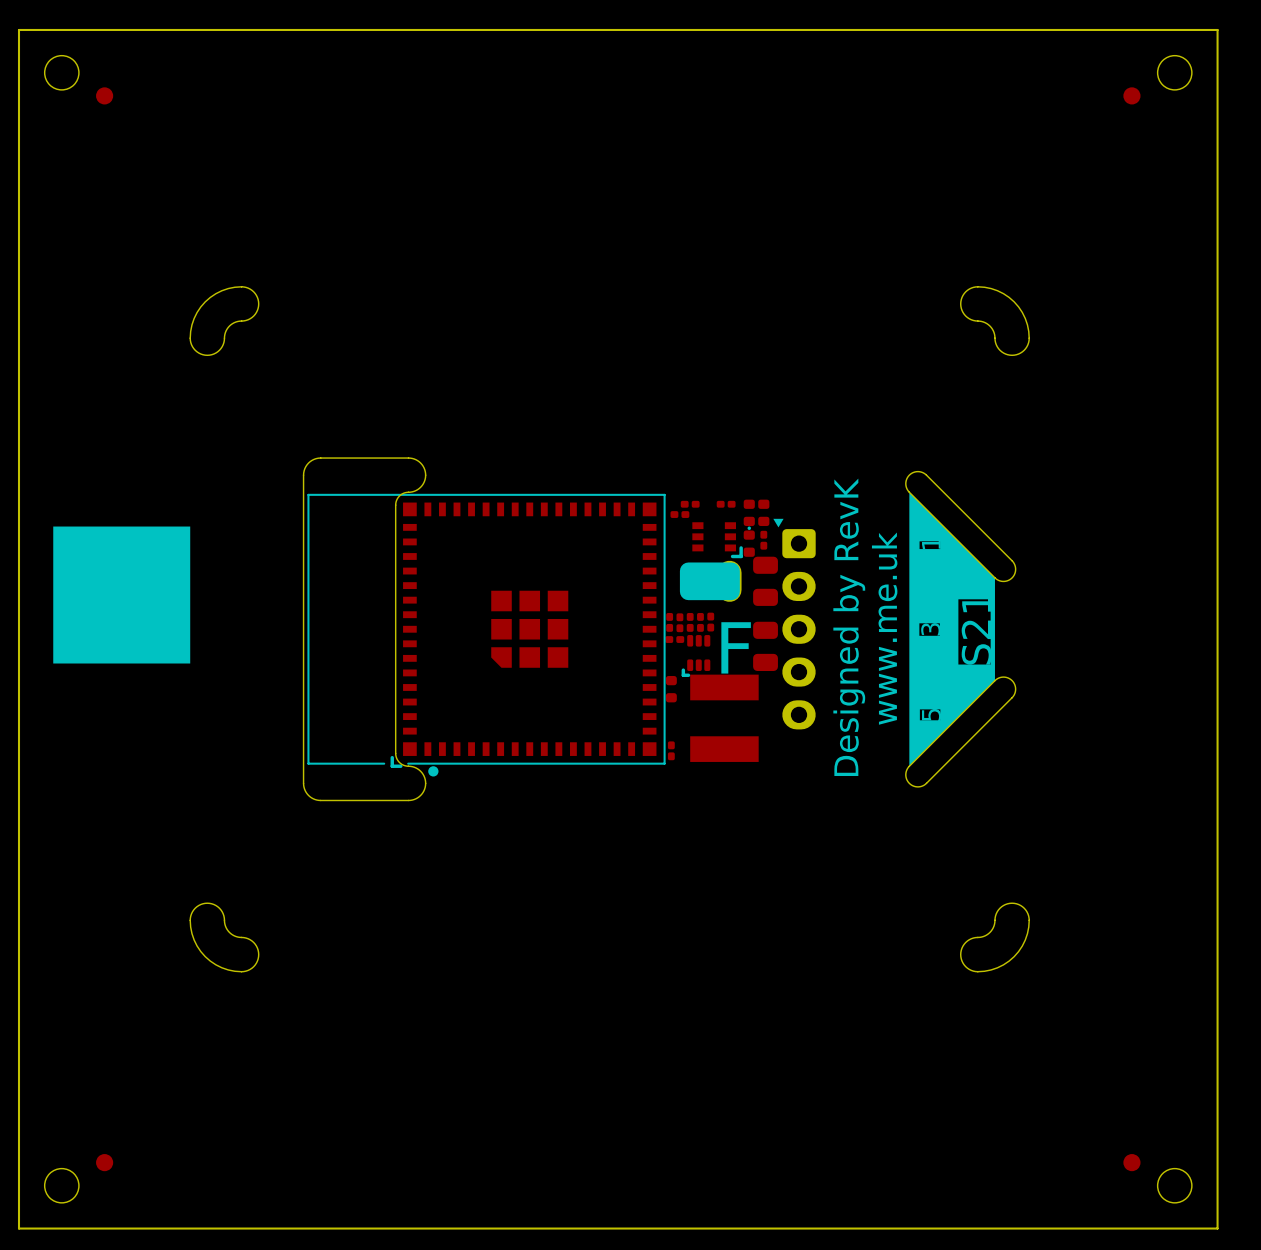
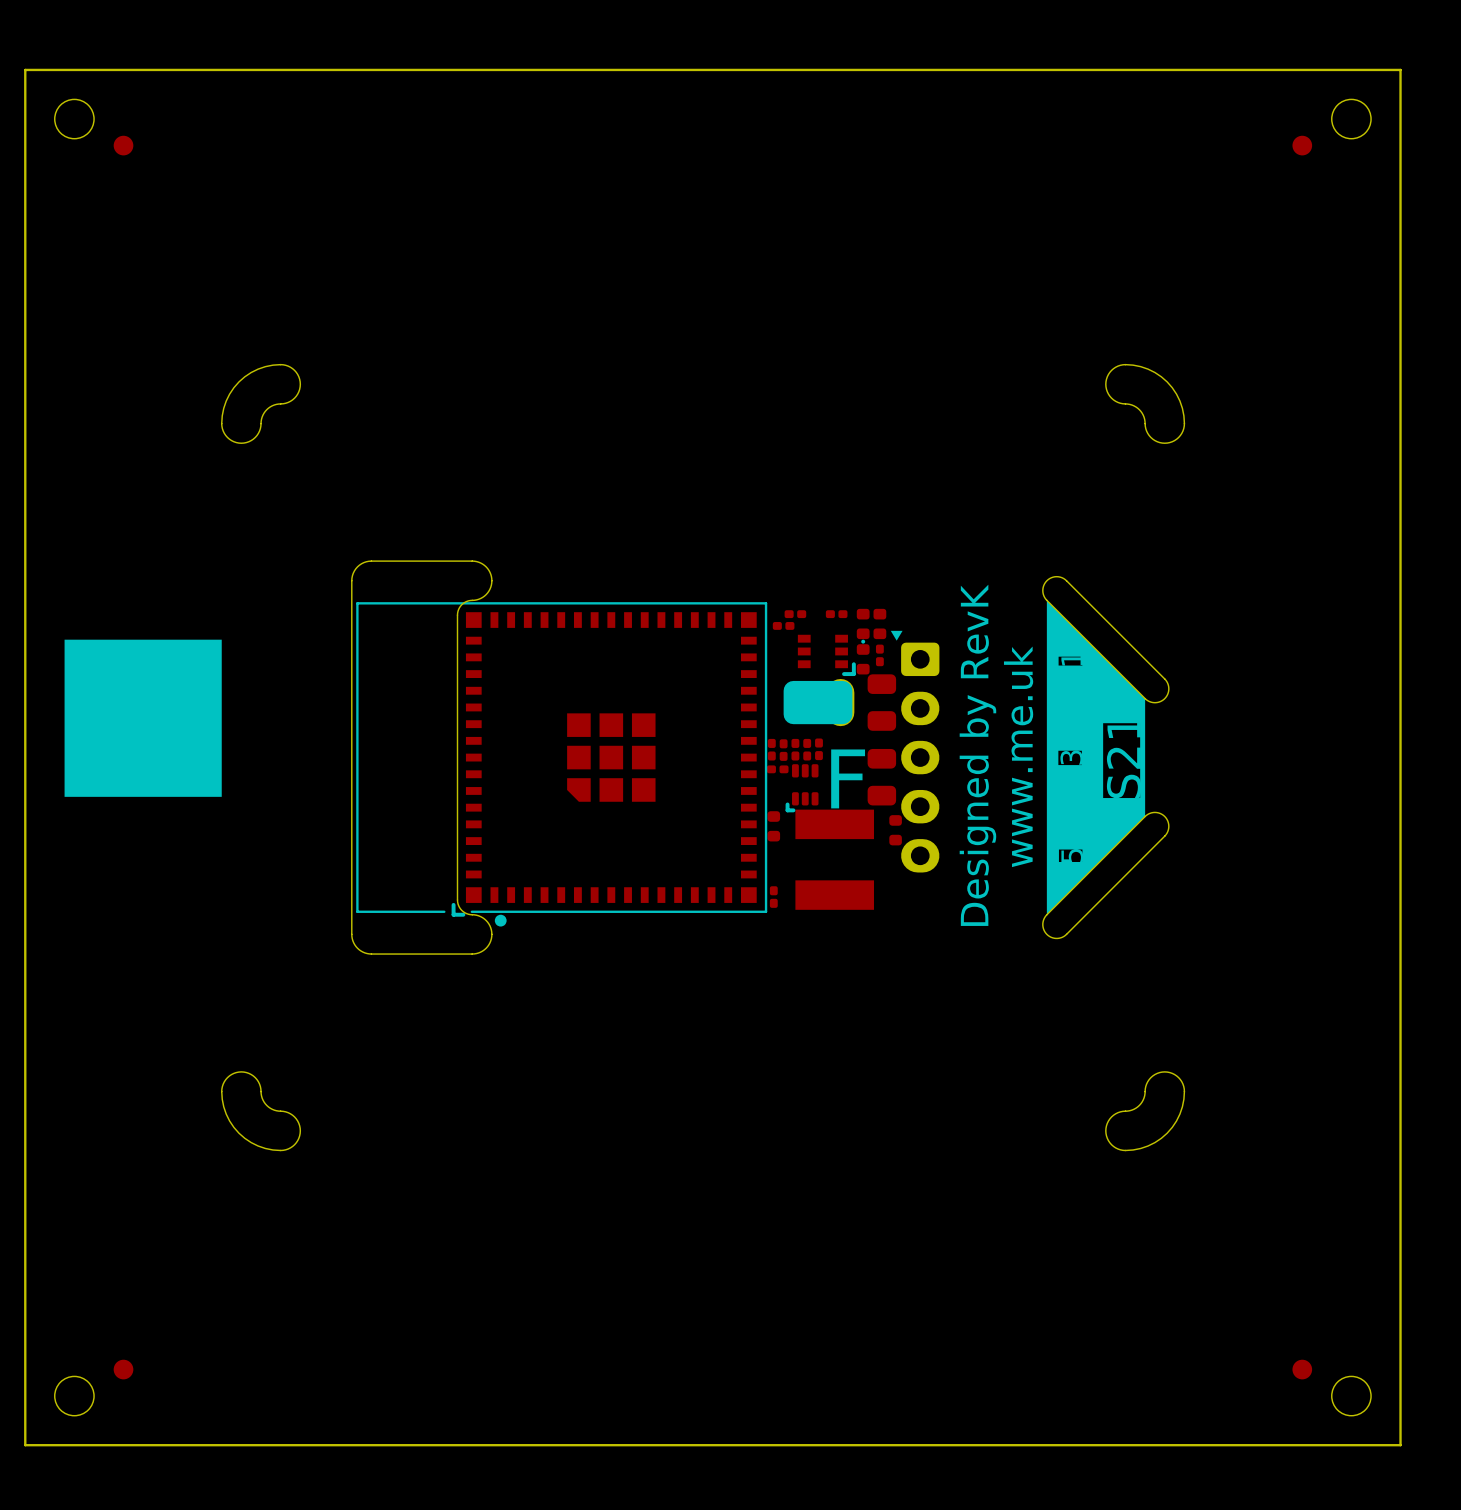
part: none -> (895, 830)

